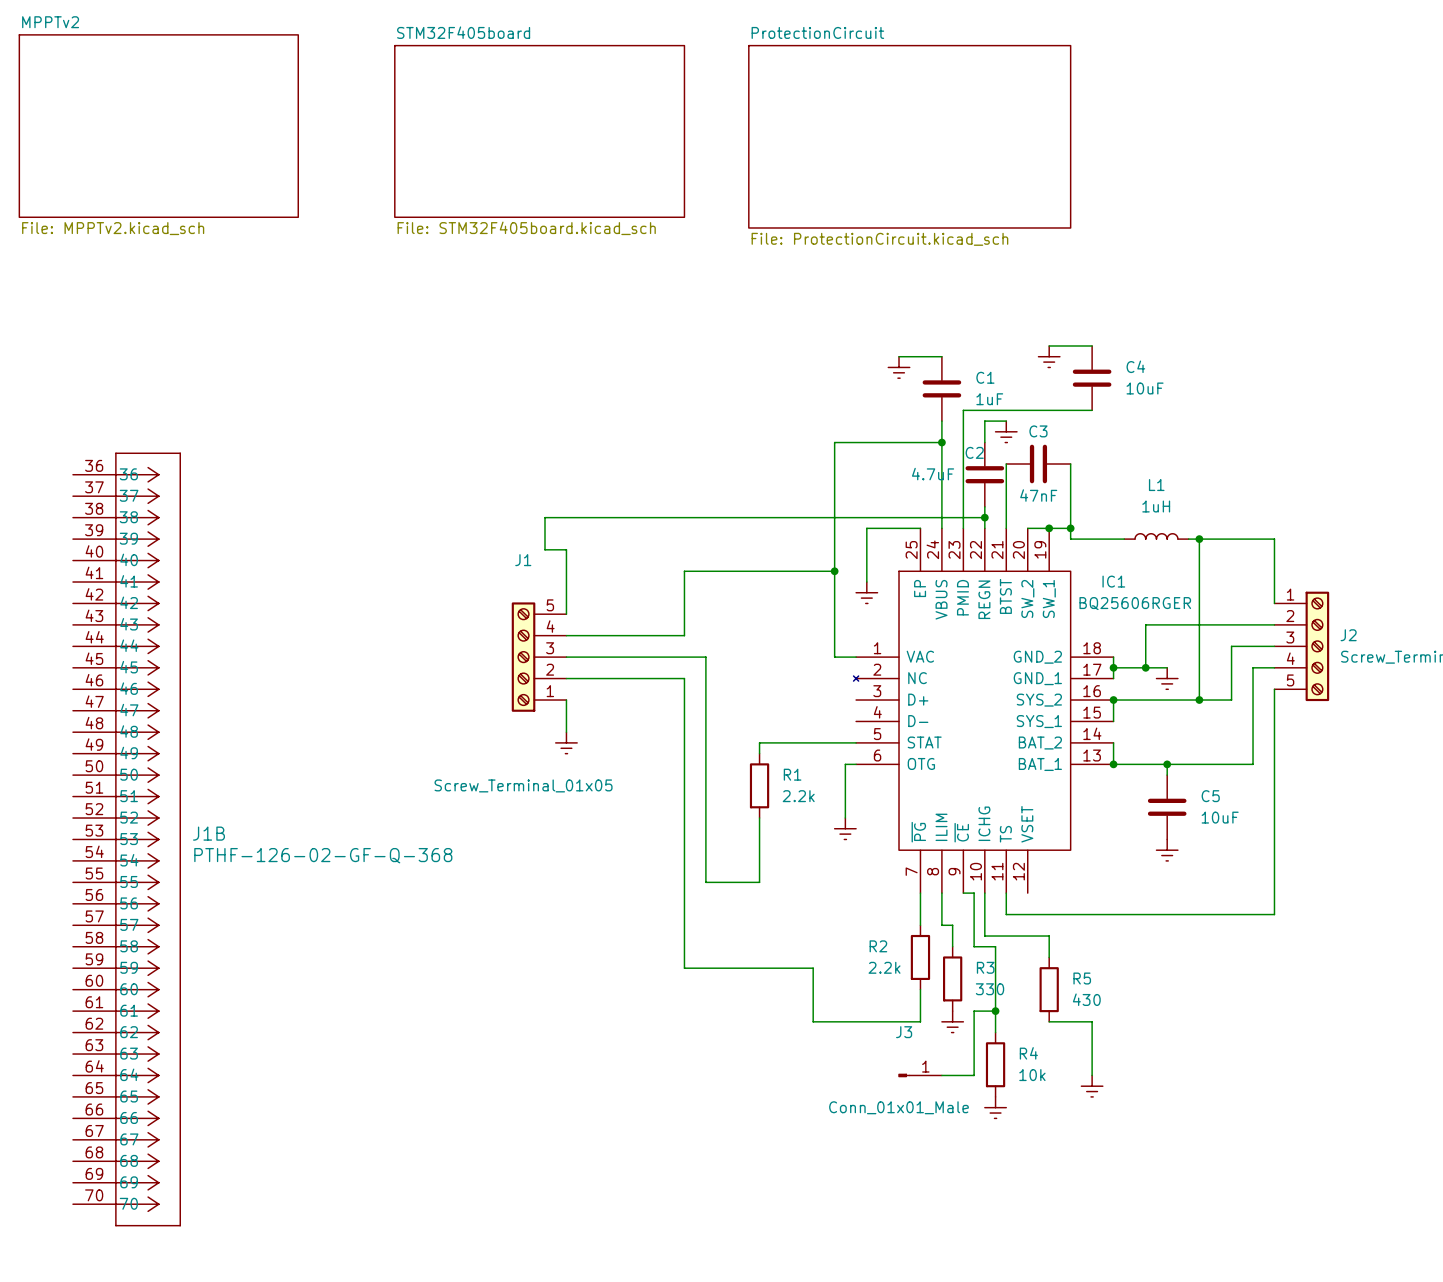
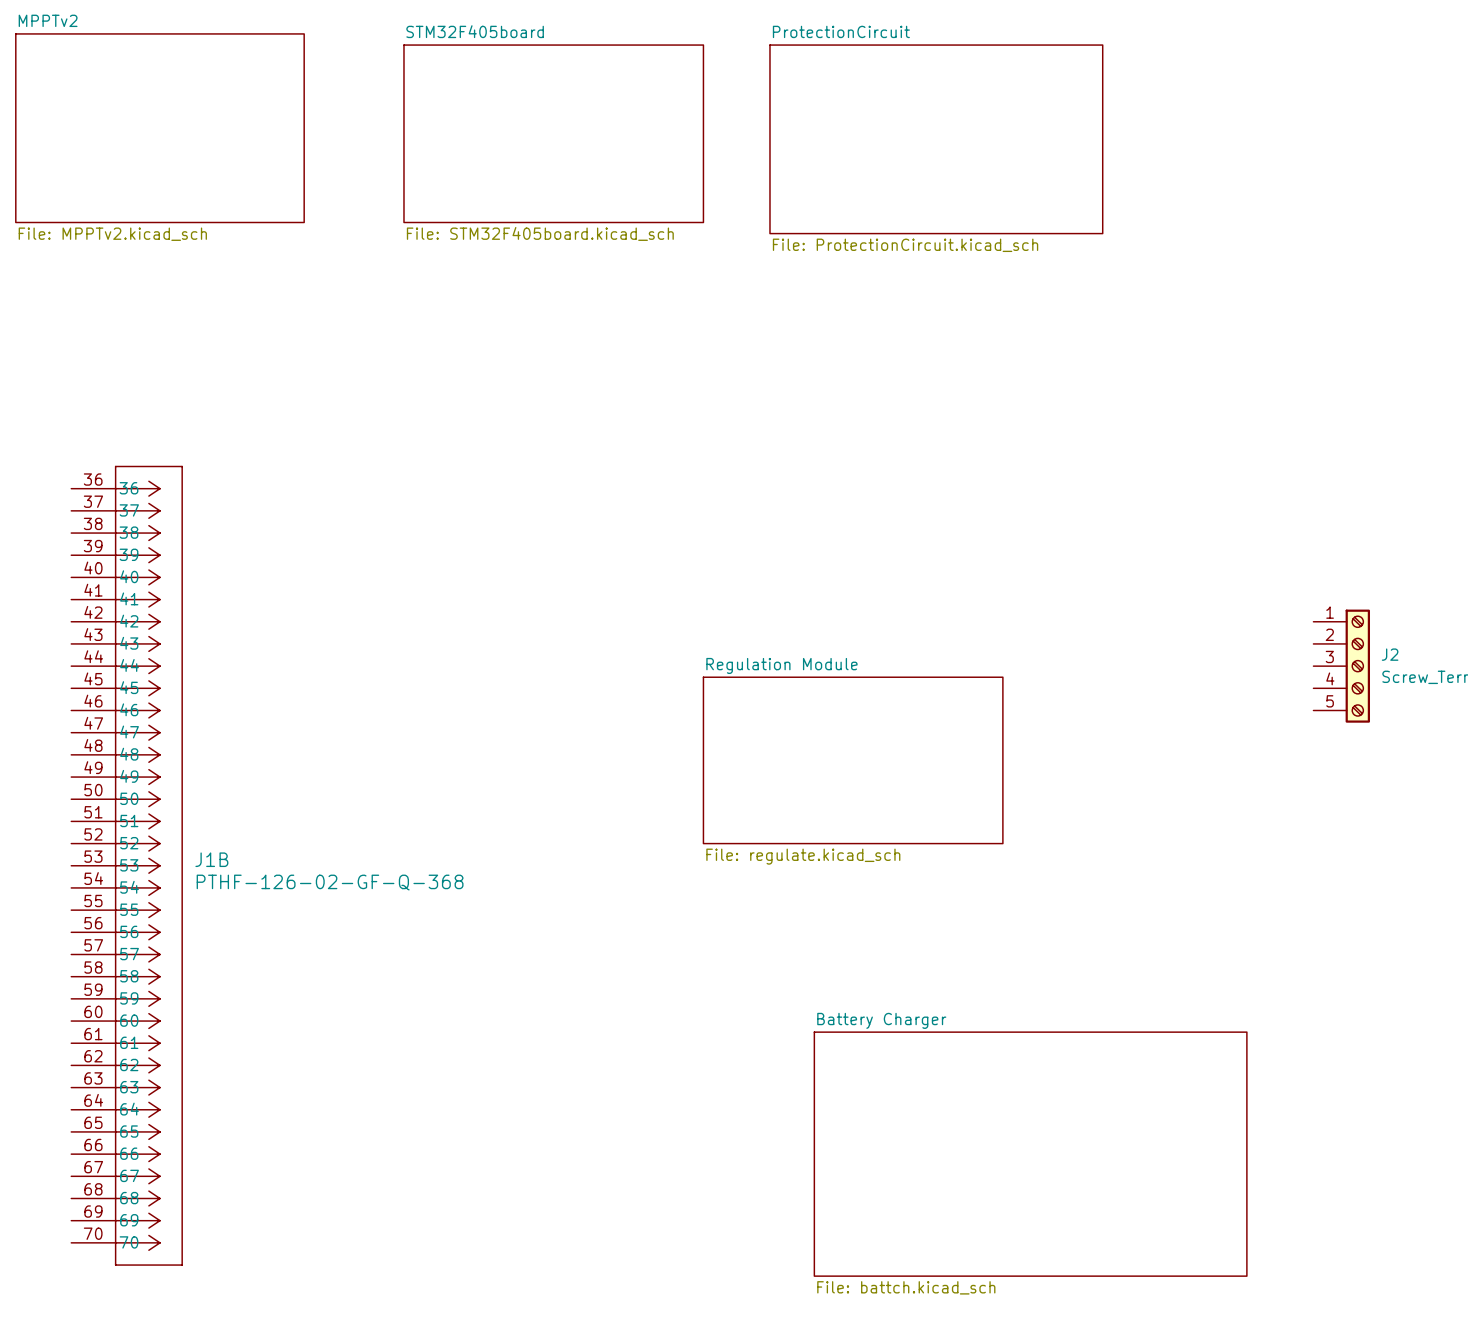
wire: (1049, 345) (1092, 345) -> none
wire: (899, 356) (941, 356) -> none
power symbol: (1049, 356) -> none
power symbol: (899, 367) -> none
C4: 10uF (1092, 378) -> none
C1: 1uF (941, 388) -> none
wire: (1092, 410) (963, 410) (963, 528) -> none
wire: (941, 421) (941, 528) -> none
wire: (1006, 421) (984, 421) (984, 442) -> none
power symbol: (1006, 431) -> none
wire: (941, 442) (834, 442) (834, 657) (856, 657) -> none
junction: (941, 442) -> none
wire: (1006, 464) (1006, 528) -> none
C3: 47nF (1038, 464) -> none
wire: (1070, 464) (1070, 539) (1124, 539) -> none
C2: 4.7uF (984, 474) -> none
wire: (984, 506) (984, 528) -> none
wire: (984, 517) (544, 517) (544, 549) (566, 549) (566, 614) -> none
junction: (984, 517) -> none
wire: (920, 528) (866, 528) (866, 582) -> none
wire: (1027, 528) (1070, 528) -> none
junction: (1049, 528) -> none
junction: (1070, 528) -> none
L1: 1uH (1156, 536) -> none
wire: (1188, 539) (1274, 539) (1274, 603) -> none
wire: (1199, 539) (1199, 700) -> none
junction: (1199, 539) -> none
wire: (834, 571) (684, 571) (684, 635) (566, 635) -> none
junction: (834, 571) -> none
power symbol: (866, 592) -> none
wire: (1274, 624) (1145, 624) (1145, 667) -> none
wire: (1274, 646) (1231, 646) (1231, 700) (1113, 700) (1113, 721) -> none
J1: Screw_Terminal_01x05 (539, 657) -> none
wire: (566, 657) (705, 657) (705, 882) (759, 882) (759, 818) -> none
wire: (1113, 657) (1113, 678) -> none
wire: (1113, 667) (1167, 667) -> none
junction: (1113, 667) -> none
junction: (1145, 667) -> none
wire: (1274, 667) (1253, 667) (1253, 764) (1113, 764) (1113, 742) -> none
wire: (566, 678) (684, 678) (684, 968) (813, 968) (813, 1021) (920, 1021) (920, 989) -> none
power symbol: (1167, 678) -> none
wire: (1274, 689) (1274, 914) (1006, 914) (1006, 893) -> none
wire: (566, 700) (566, 732) -> none
junction: (1113, 700) -> none
junction: (1199, 700) -> none
IC1: BQ25606RGER (983, 710) -> none
sheet Regulation Module: none -> File: regulate.kicad_sch (853, 760)
power symbol: (566, 742) -> none
wire: (856, 742) (759, 742) (759, 753) -> none
wire: (856, 764) (845, 764) (845, 818) -> none
junction: (1113, 764) -> none
wire: (1167, 764) (1167, 775) -> none
junction: (1167, 764) -> none
R1: 2.2k (759, 785) -> none
C5: 10uF (1167, 807) -> none
power symbol: (845, 828) -> none
power symbol: (1167, 850) -> none
wire: (920, 893) (920, 925) -> none
wire: (941, 893) (941, 925) (952, 925) (952, 946) -> none
wire: (963, 893) (974, 893) (974, 946) (995, 946) (995, 1032) -> none
wire: (984, 893) (984, 936) (1049, 936) (1049, 957) -> none
R2: 2.2k (920, 957) -> none
R3: 330 (952, 978) -> none
R5: 430 (1049, 989) -> none
wire: (995, 1011) (974, 1011) (974, 1075) (941, 1075) -> none
junction: (995, 1011) -> none
power symbol: (952, 1021) -> none
wire: (1049, 1021) (1092, 1021) (1092, 1075) -> none
R4: 10k (995, 1064) -> none
J3: Conn_01x01_Male (920, 1075) -> none
power symbol: (1092, 1086) -> none
power symbol: (995, 1107) -> none
sheet Battery Charger: none -> File: battch.kicad_sch (1030, 1154)

